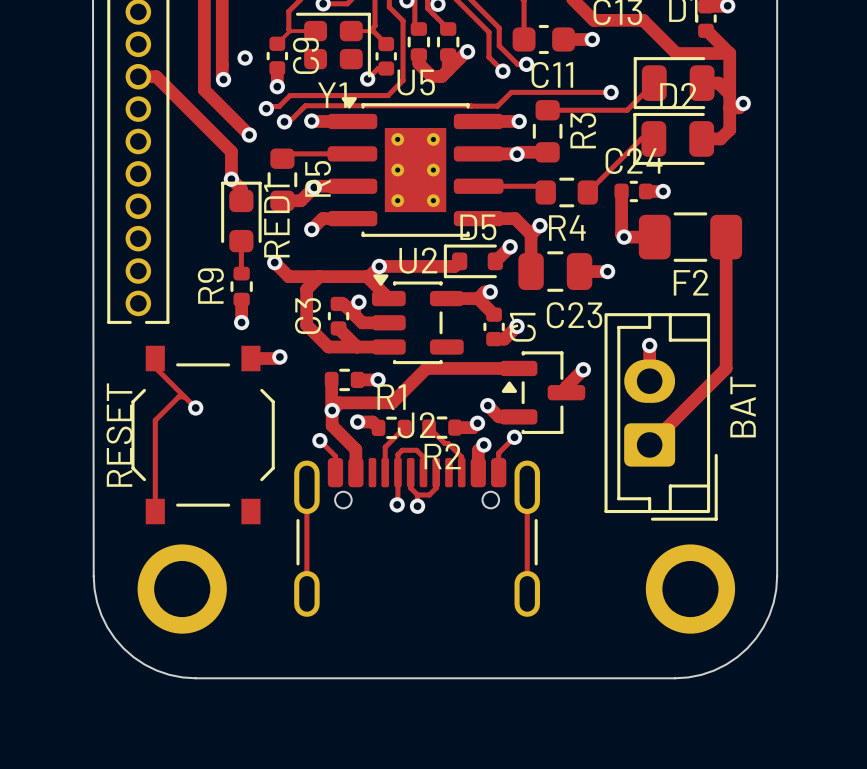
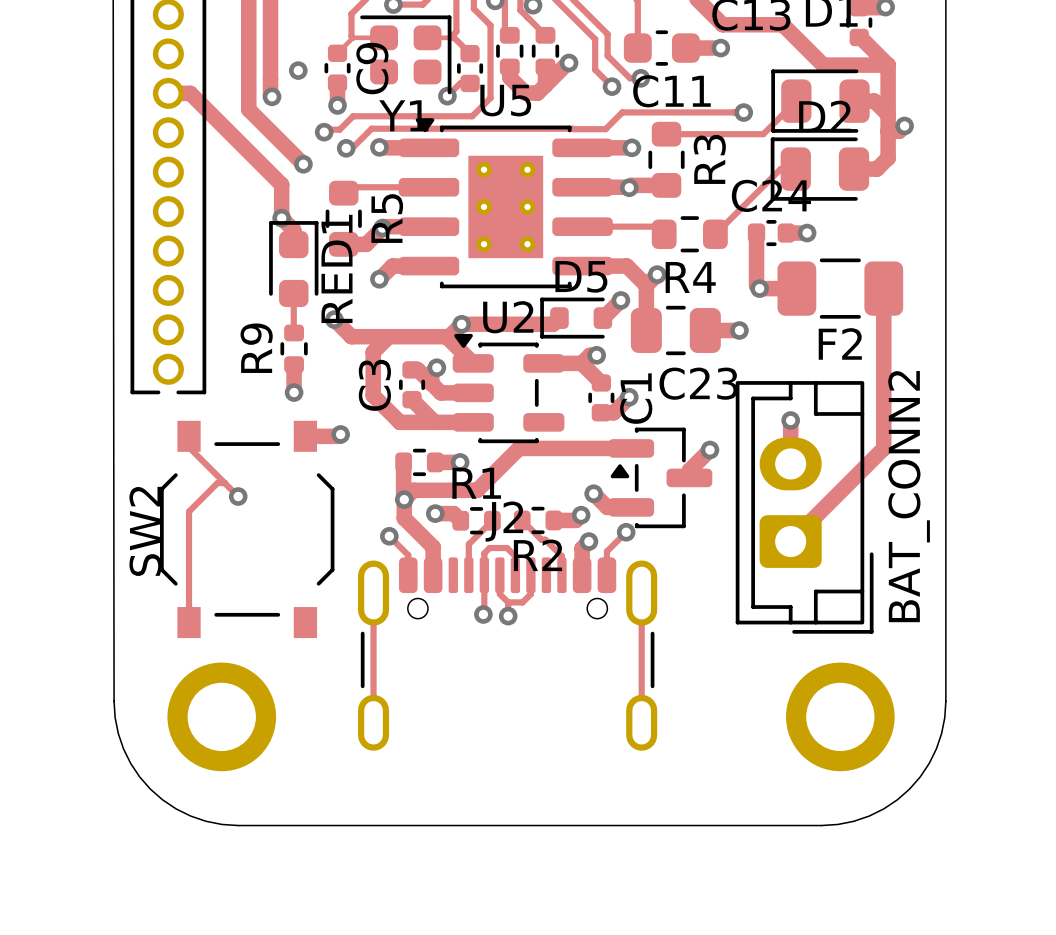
BAT name: BAT (743, 407) -> BAT_CONN2 (909, 496)
RESET name: RESET (119, 435) -> SW2 (145, 531)

